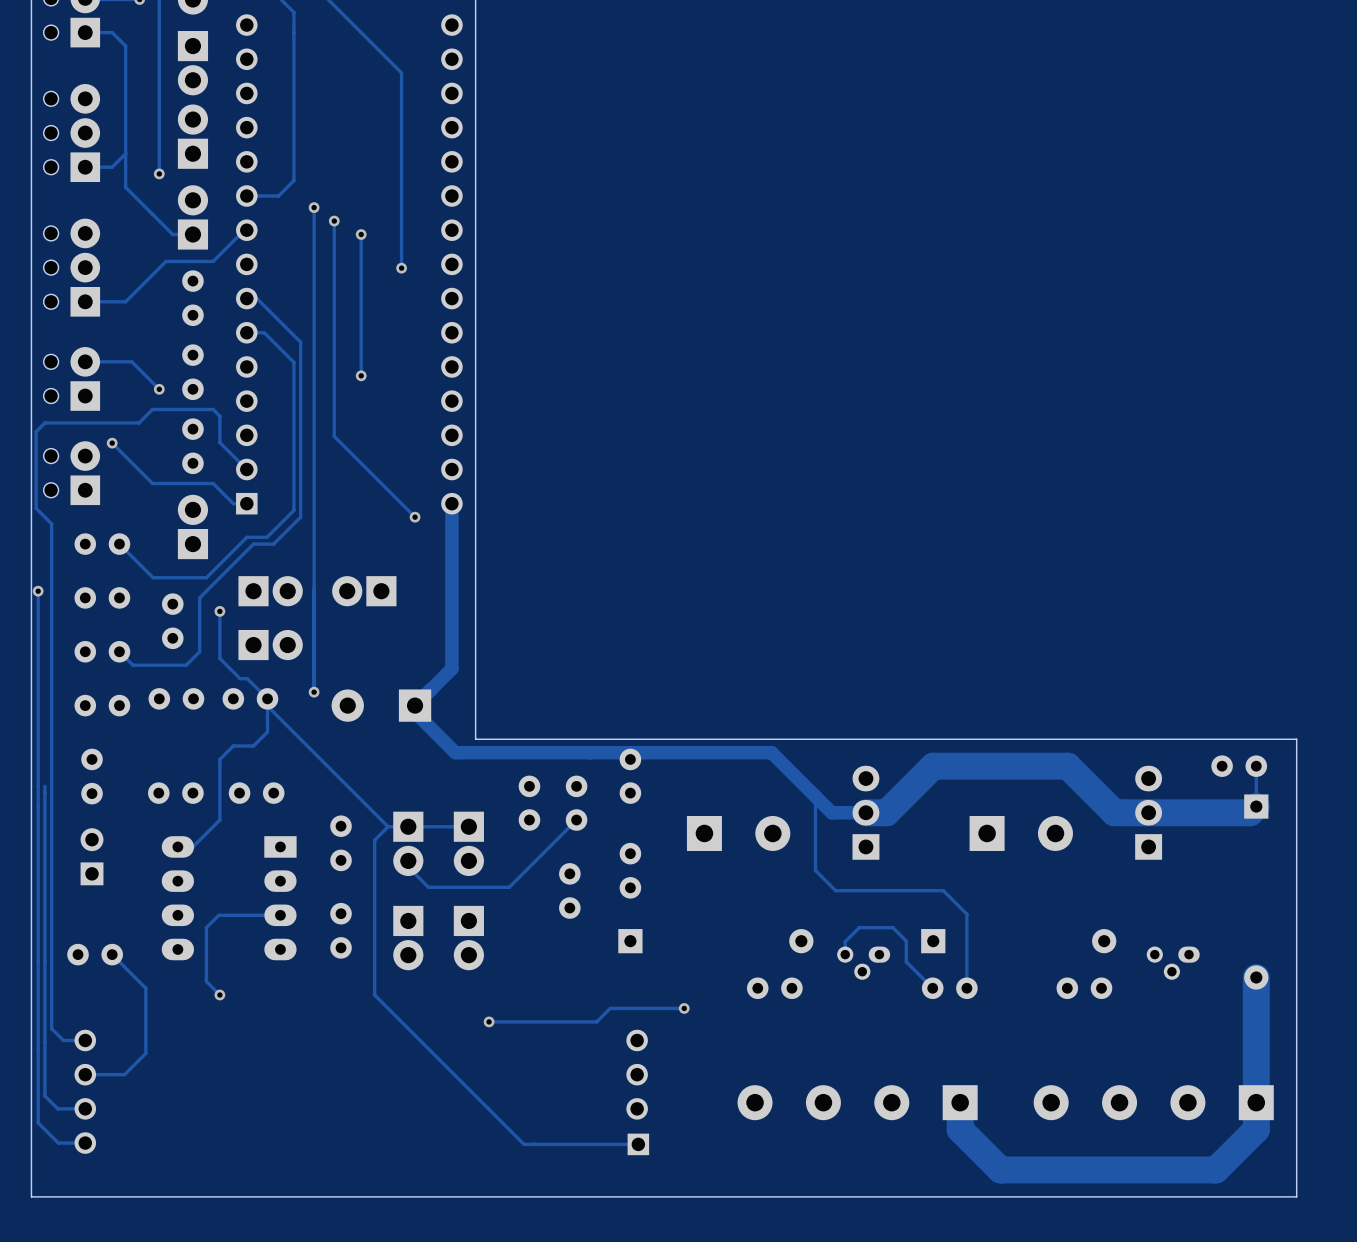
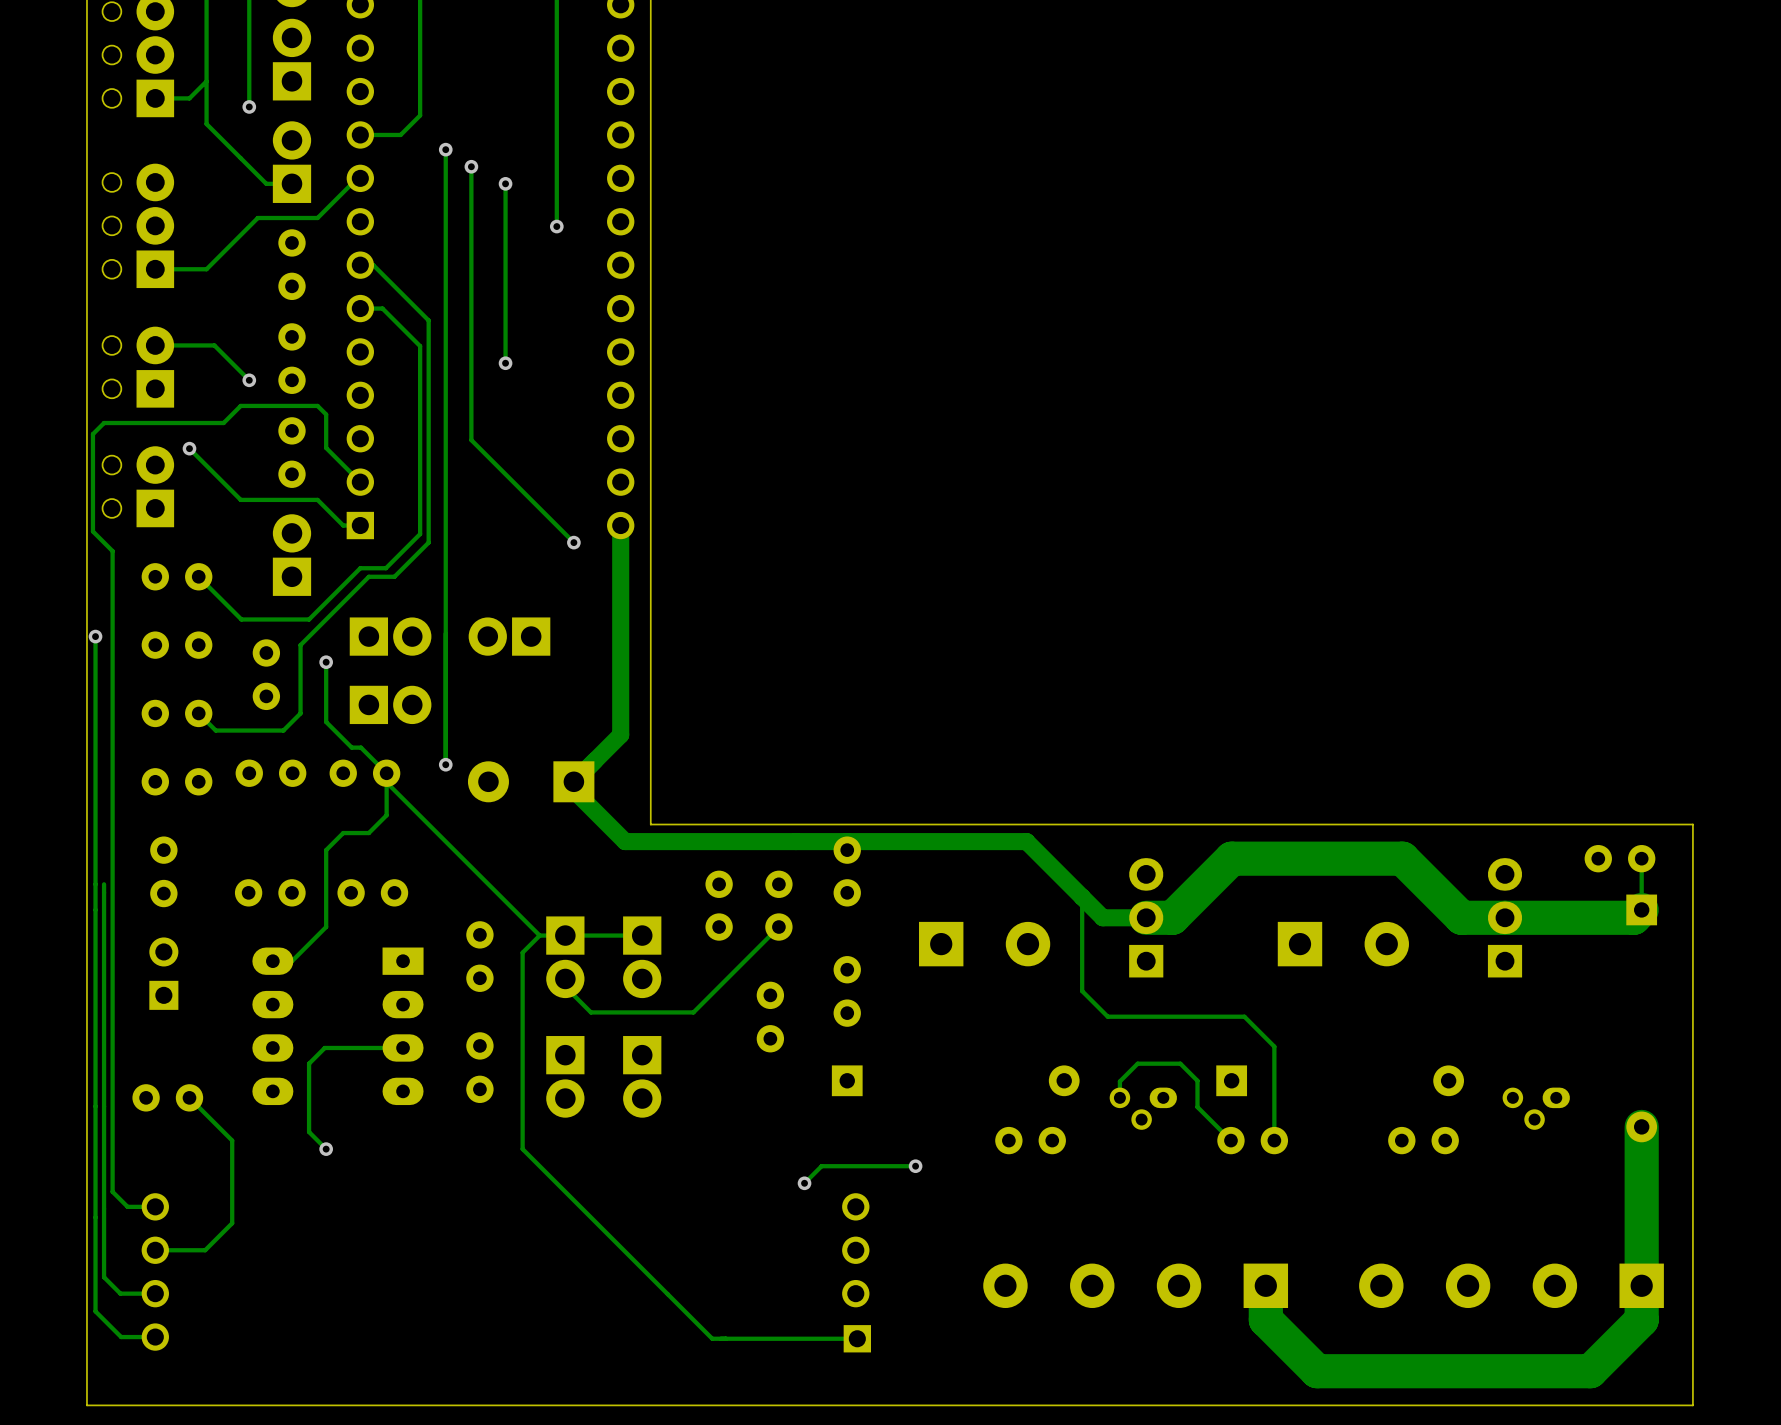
via: (489, 1021) -> none
track: (596, 1021) (489, 1021) -> none
via: none -> (804, 1183)

